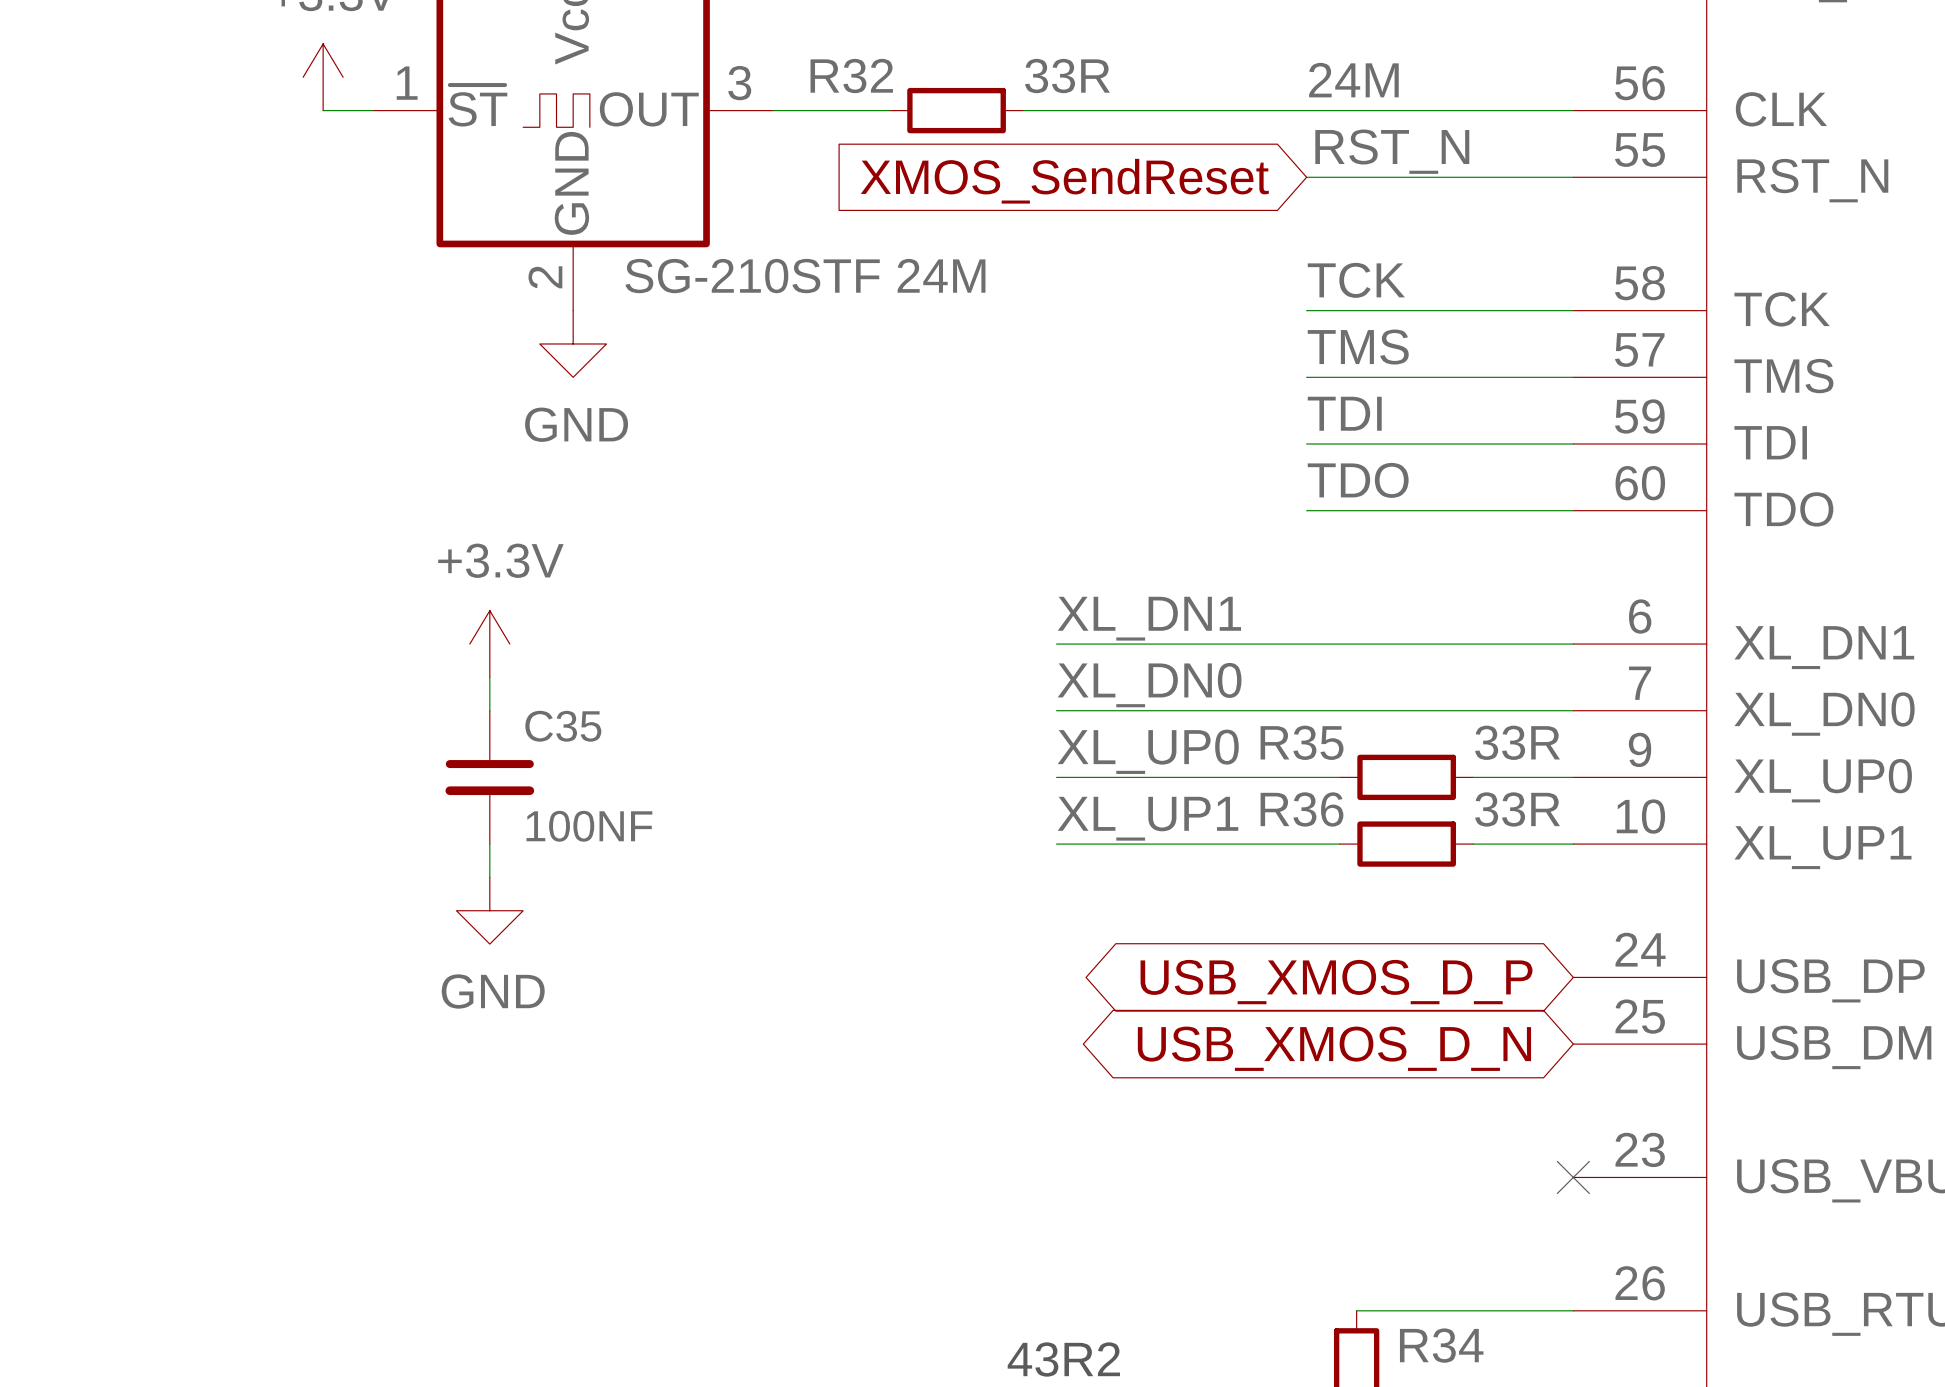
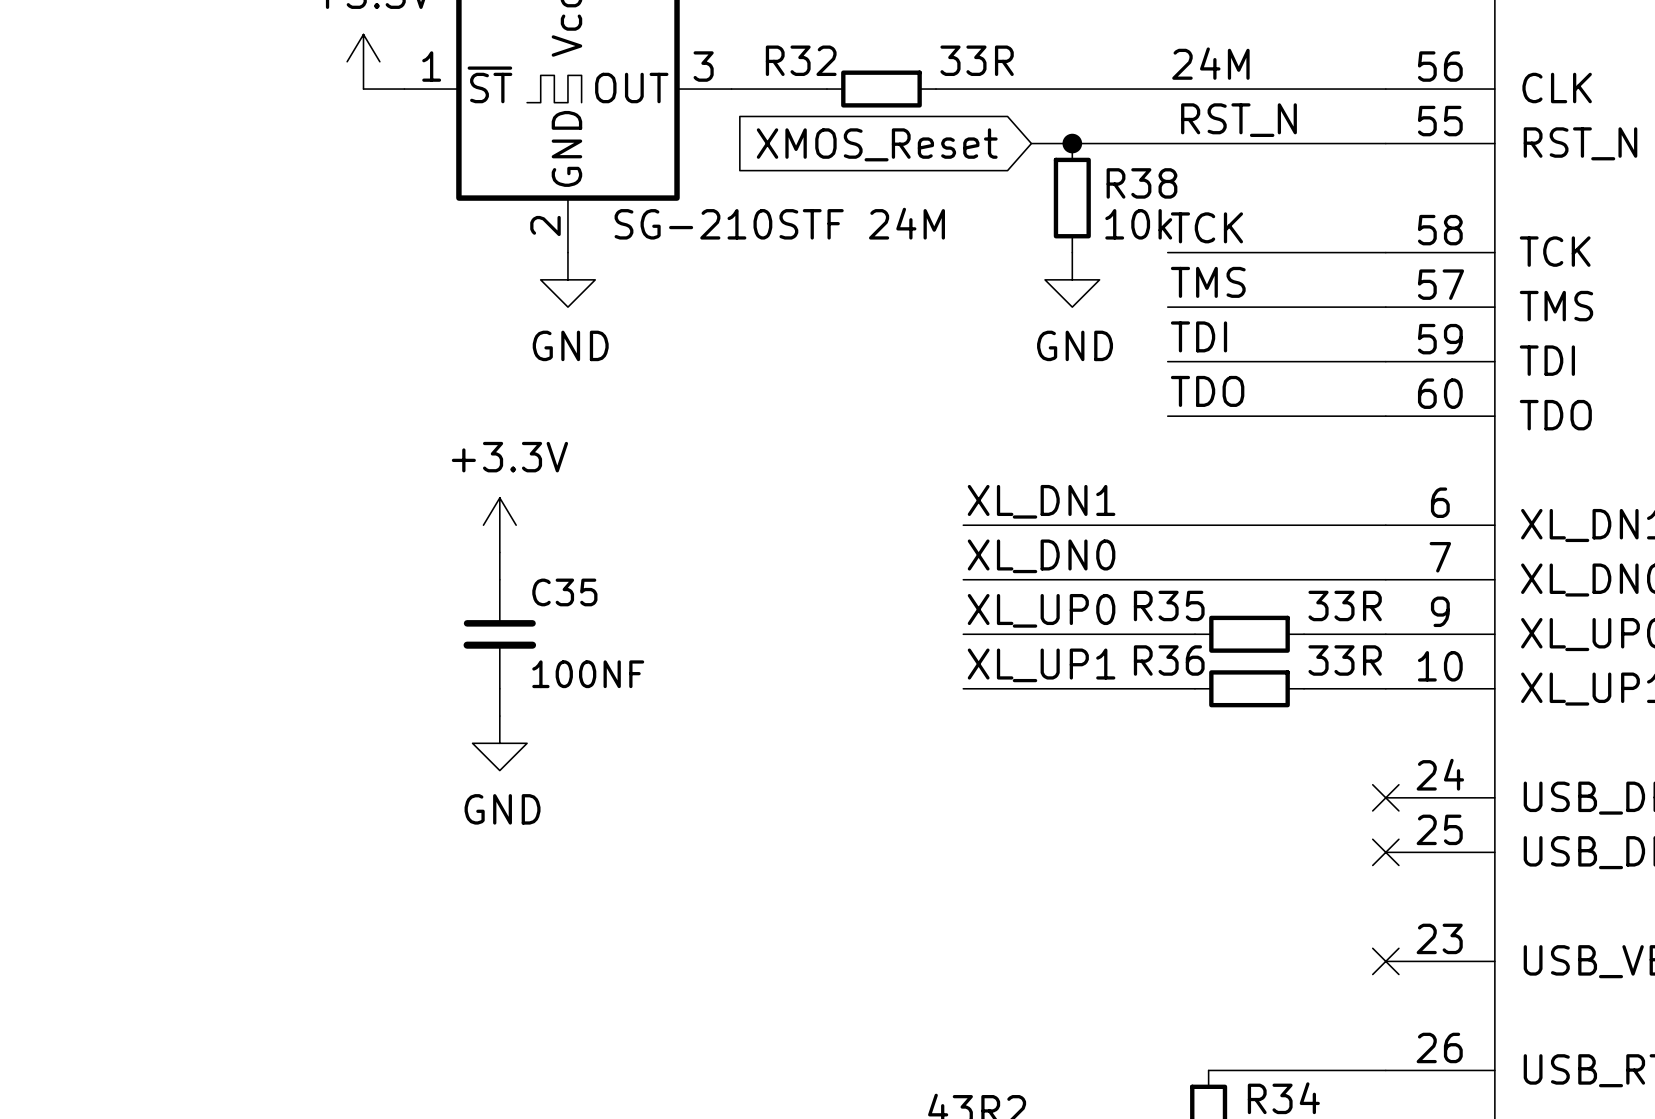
wire: none -> (1031, 143) (1167, 143)
junction: none -> (1072, 143)
global label: XMOS_SendReset (1064, 181) -> XMOS_Reset (877, 144)
R38: none -> 10k (1072, 198)
power symbol: none -> GND (1072, 279)
no-connect mark: none -> (1385, 797)
global label: USB_XMOS_D_P (1336, 982) -> none
no-connect mark: none -> (1385, 852)
global label: USB_XMOS_D_N (1334, 1048) -> none

